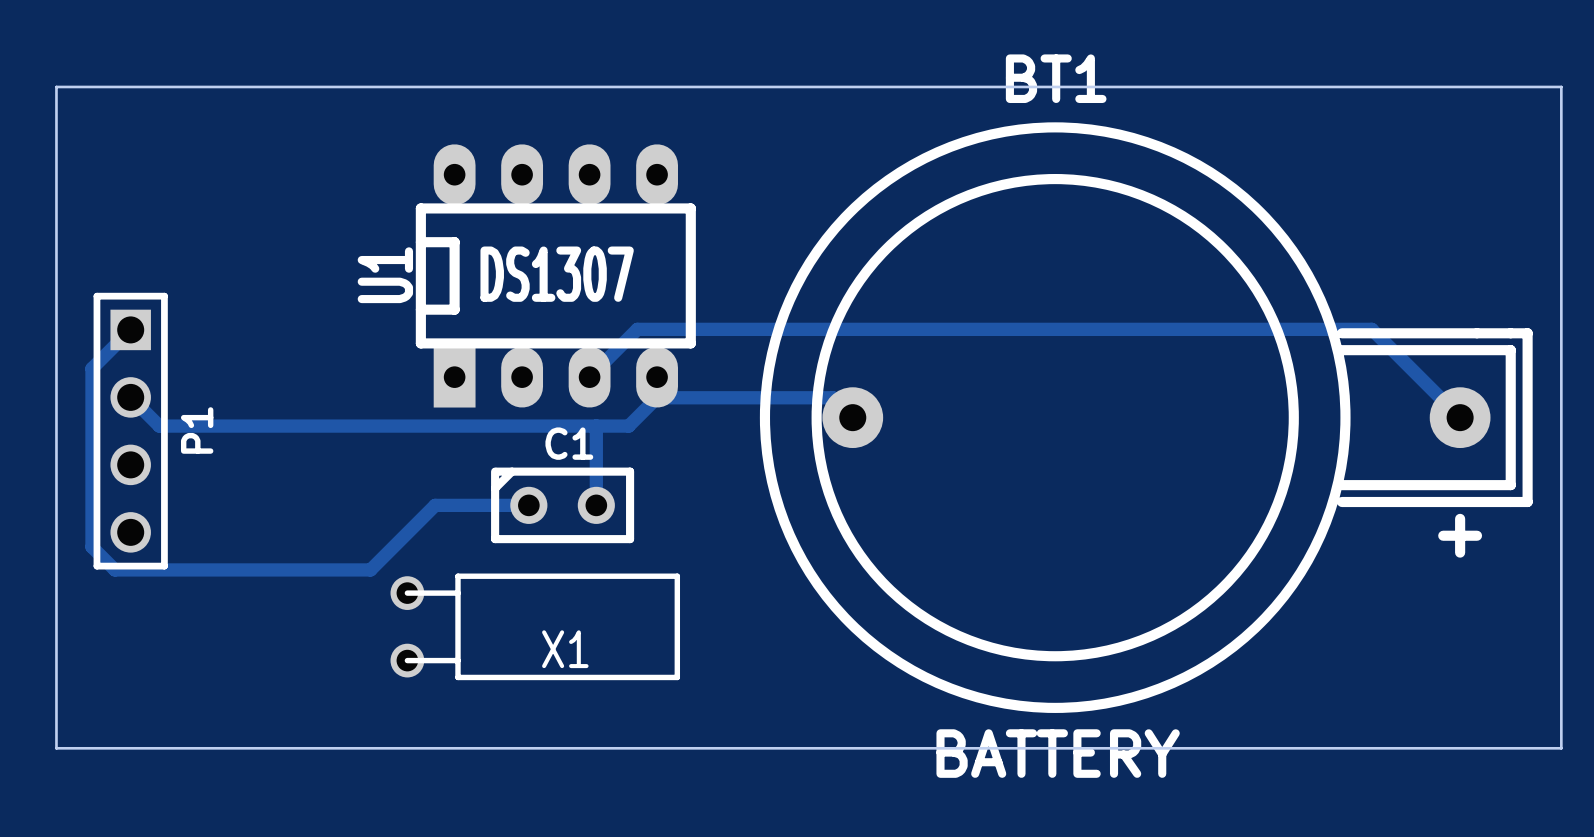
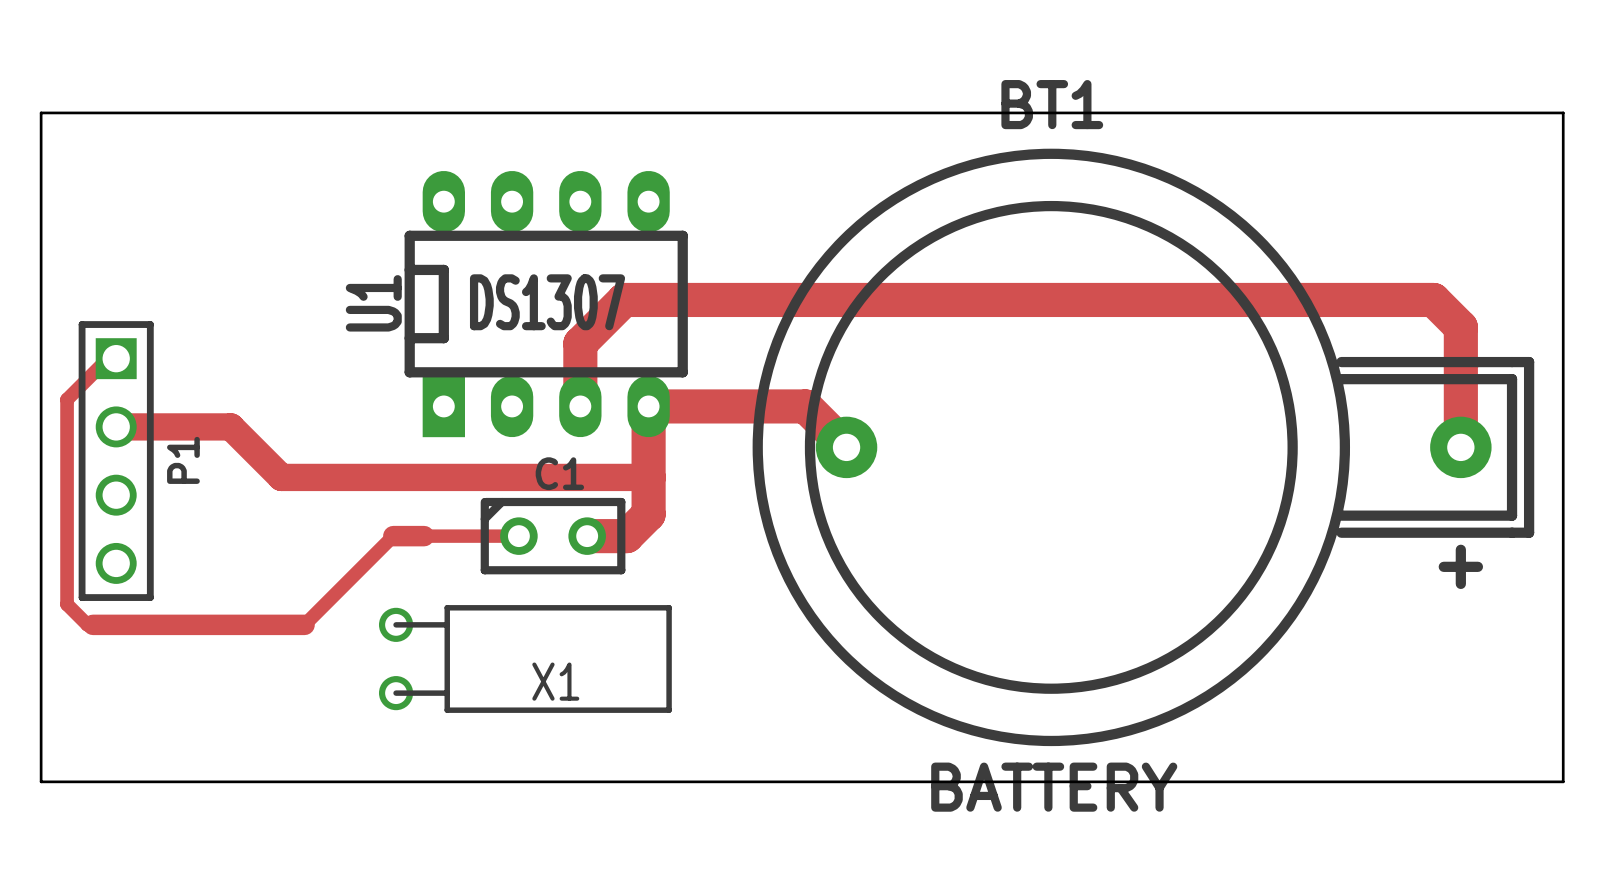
track: (130, 329) (91, 368) (91, 546) (114, 569) (370, 569) (435, 505) -> (116, 358) (108, 358) (67, 399) (67, 604) (87, 624) (304, 624) (393, 536)
track: (589, 377) (637, 329) (1371, 329) (1460, 417) -> (580, 406) (580, 343) (624, 299) (1433, 299) (1460, 327) (1460, 447)
track: (130, 397) (159, 426) (628, 426) (657, 397) (832, 397) -> (116, 426) (230, 426) (281, 477) (648, 477)
track: (596, 426) (596, 505) -> (846, 447) (805, 406) (648, 406) (648, 514) (626, 536) (587, 536)
track: none -> (393, 536) (424, 536) (393, 536)

